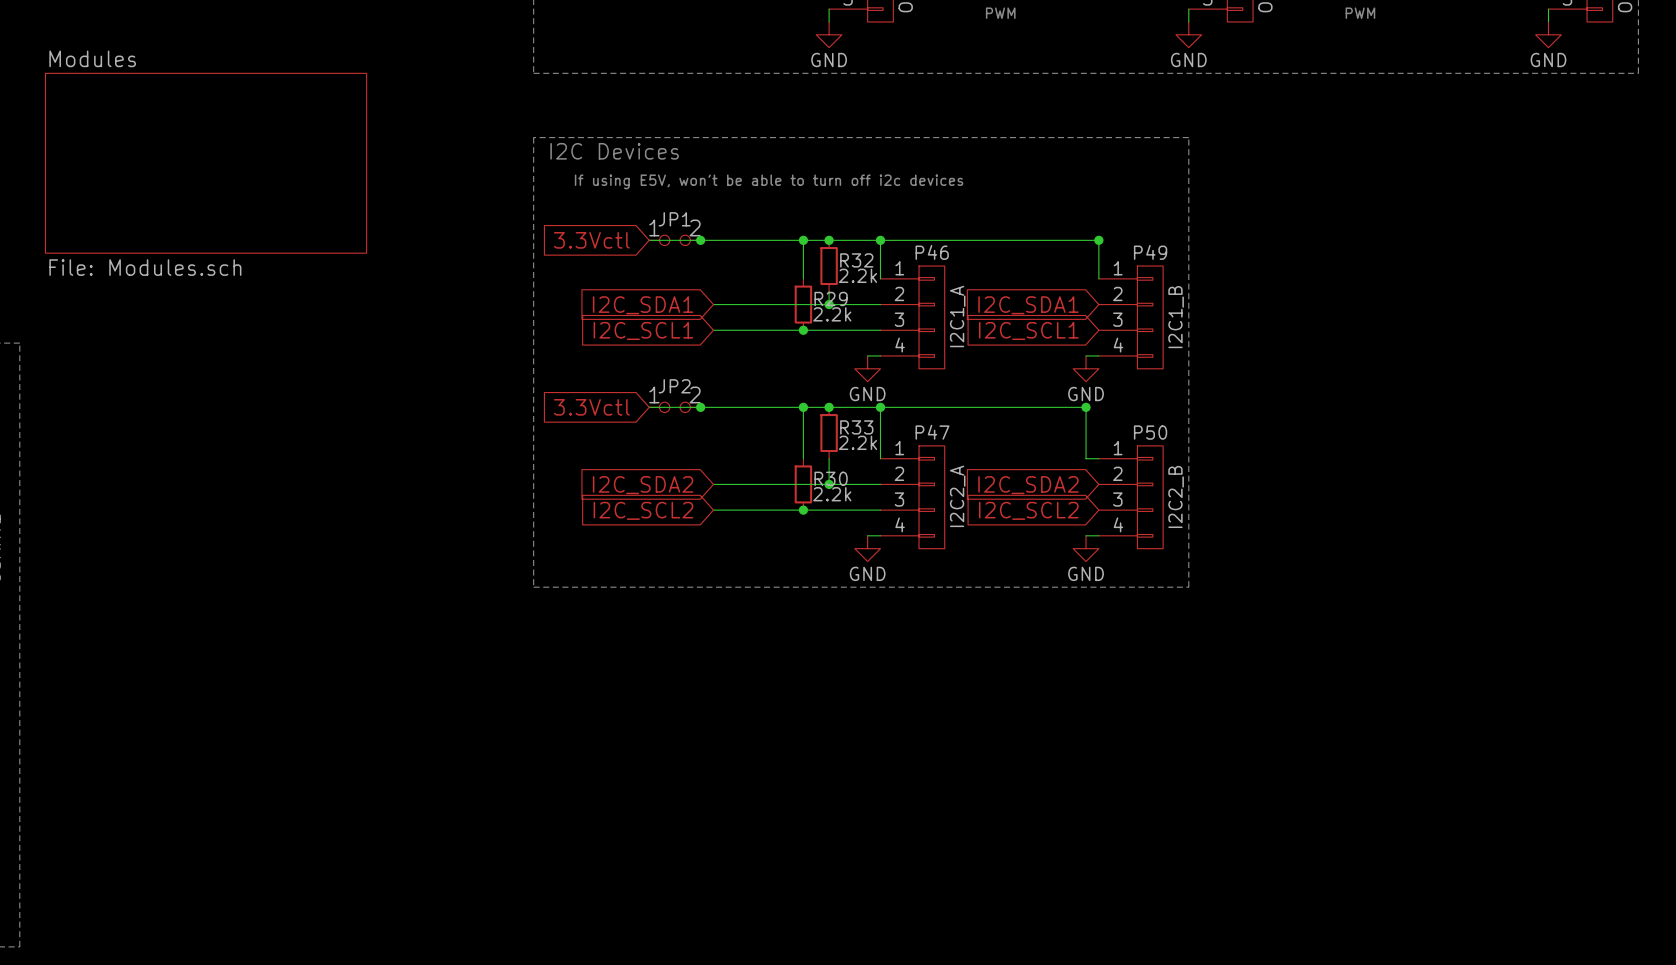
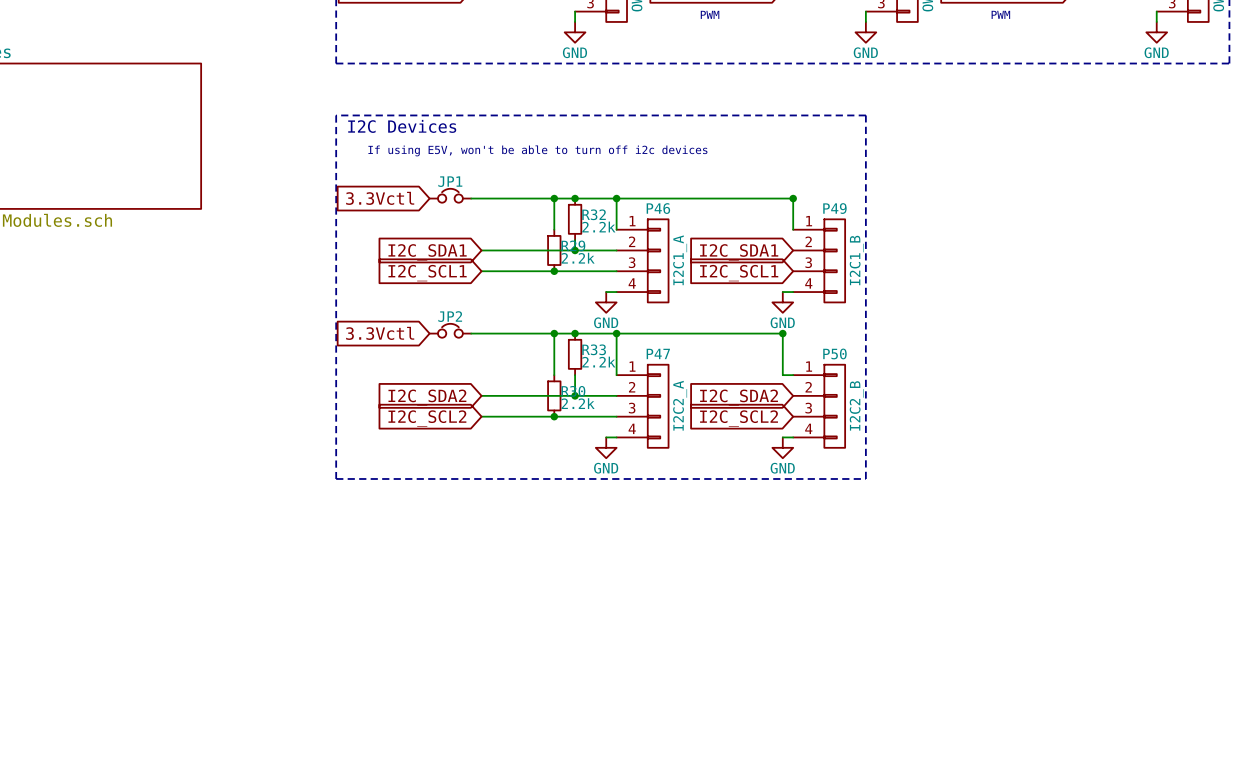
JP1 symbol: [649, 235, 701, 246] -> [429, 188, 472, 203]
wire: (649, 240) (700, 240) -> none
junction: (700, 240) -> none
JP2 symbol: [649, 402, 701, 413] -> [429, 323, 472, 338]
wire: (649, 407) (700, 407) -> none
junction: (700, 407) -> none

